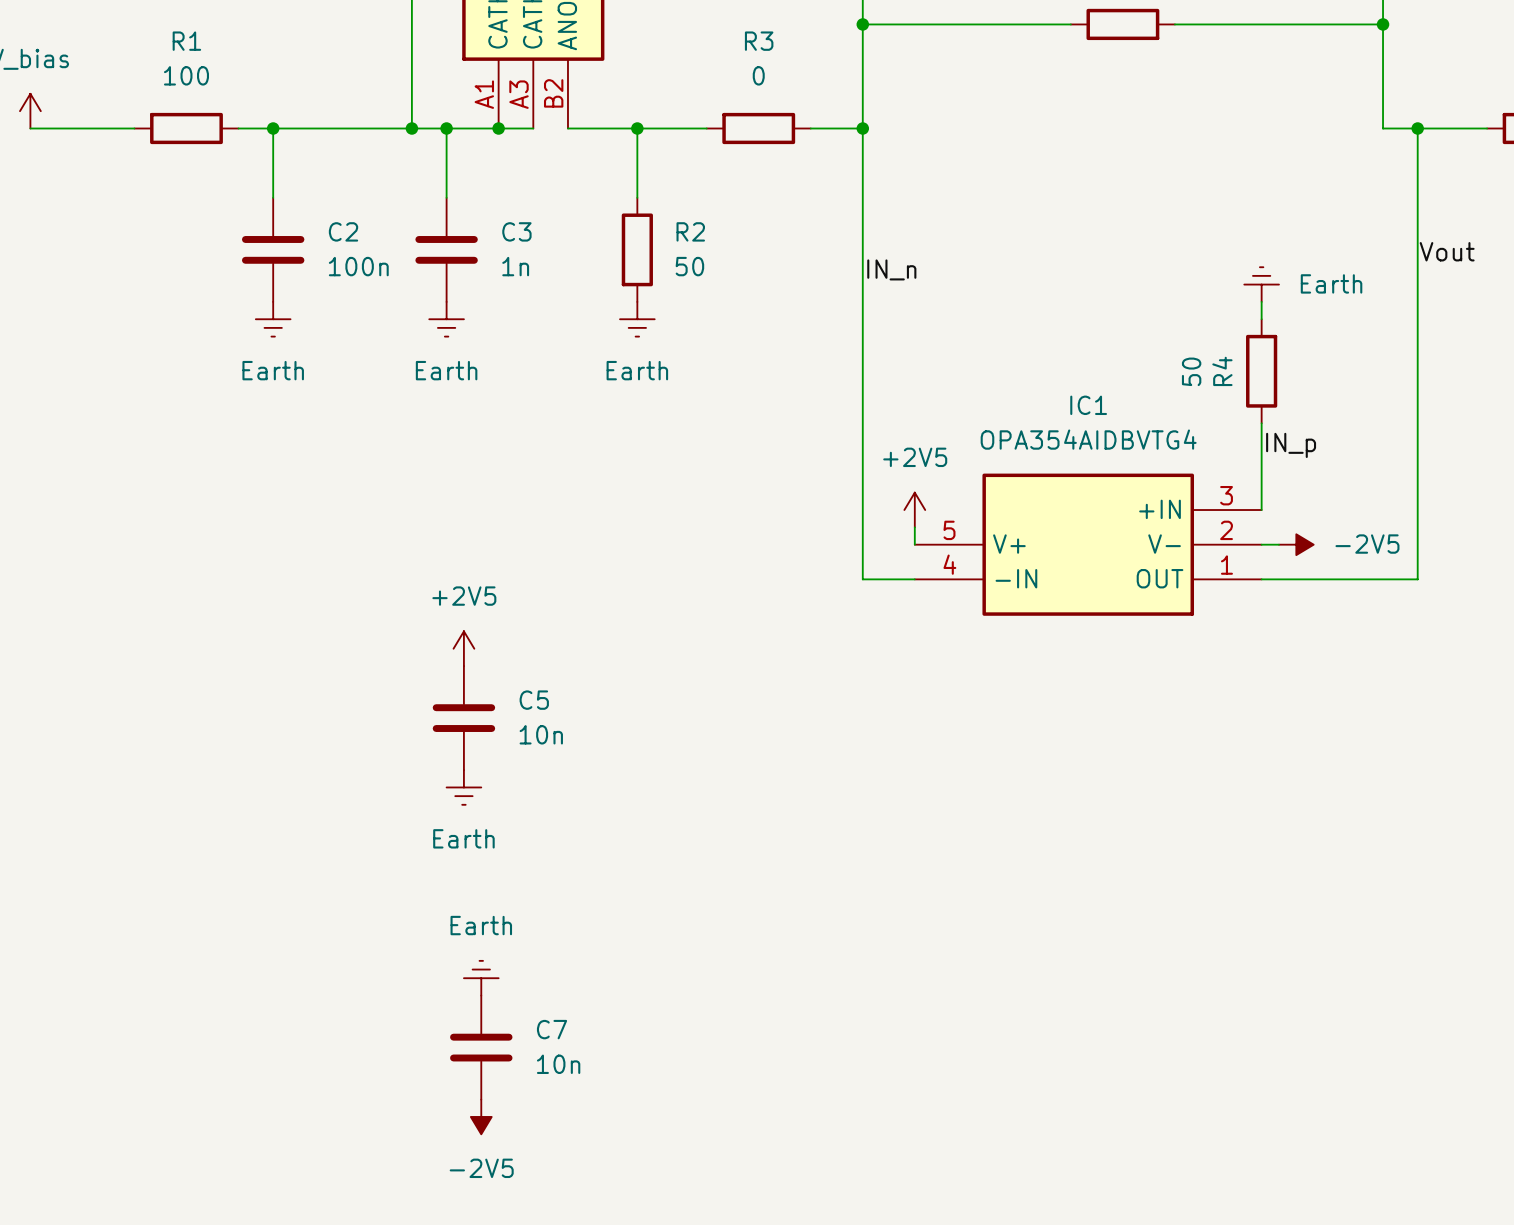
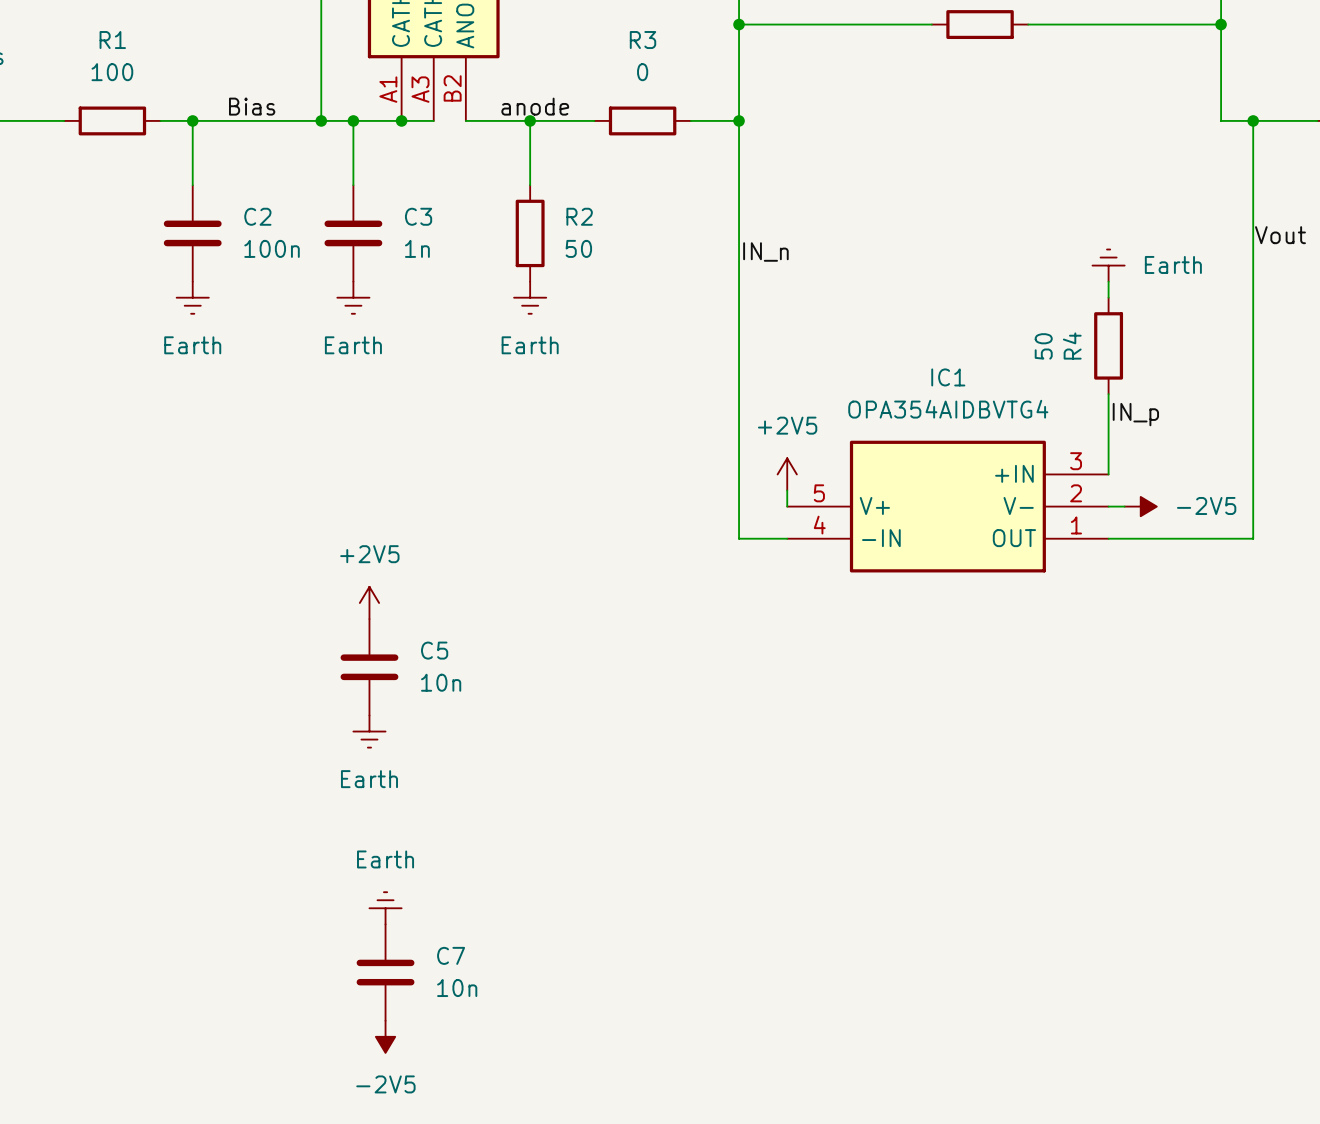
label: none -> Bias (252, 106)
label: none -> anode (535, 106)

